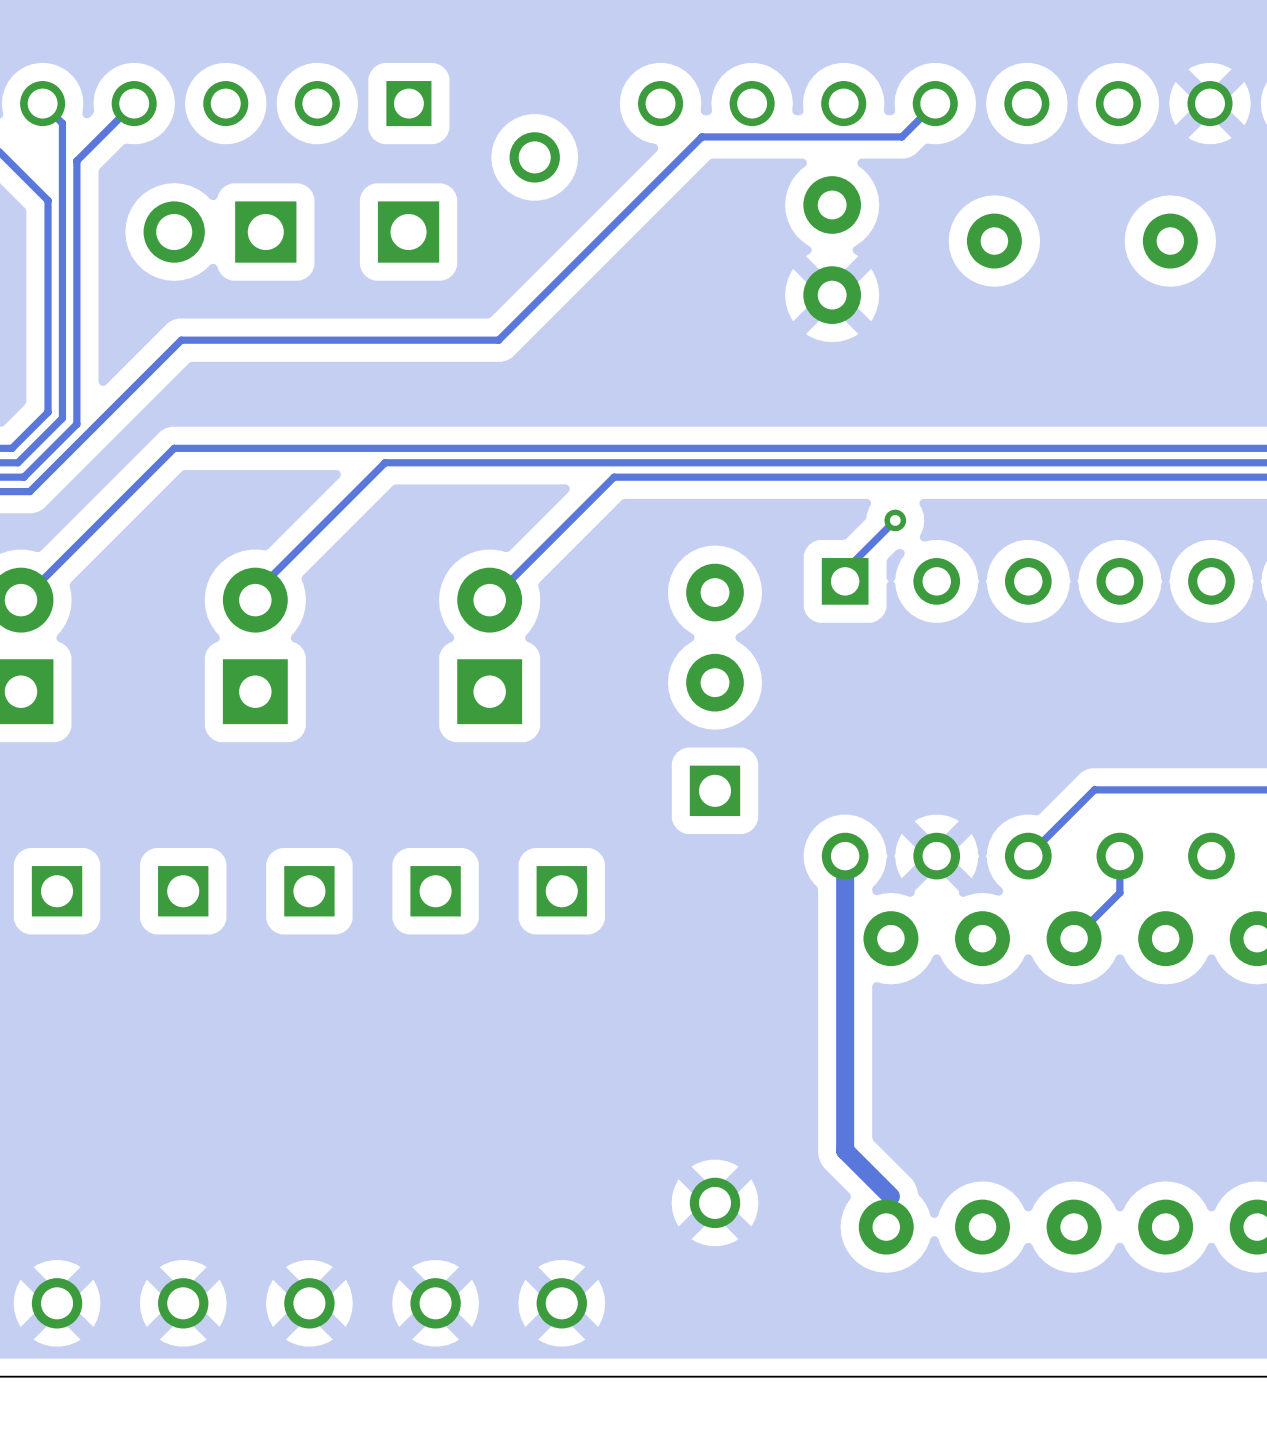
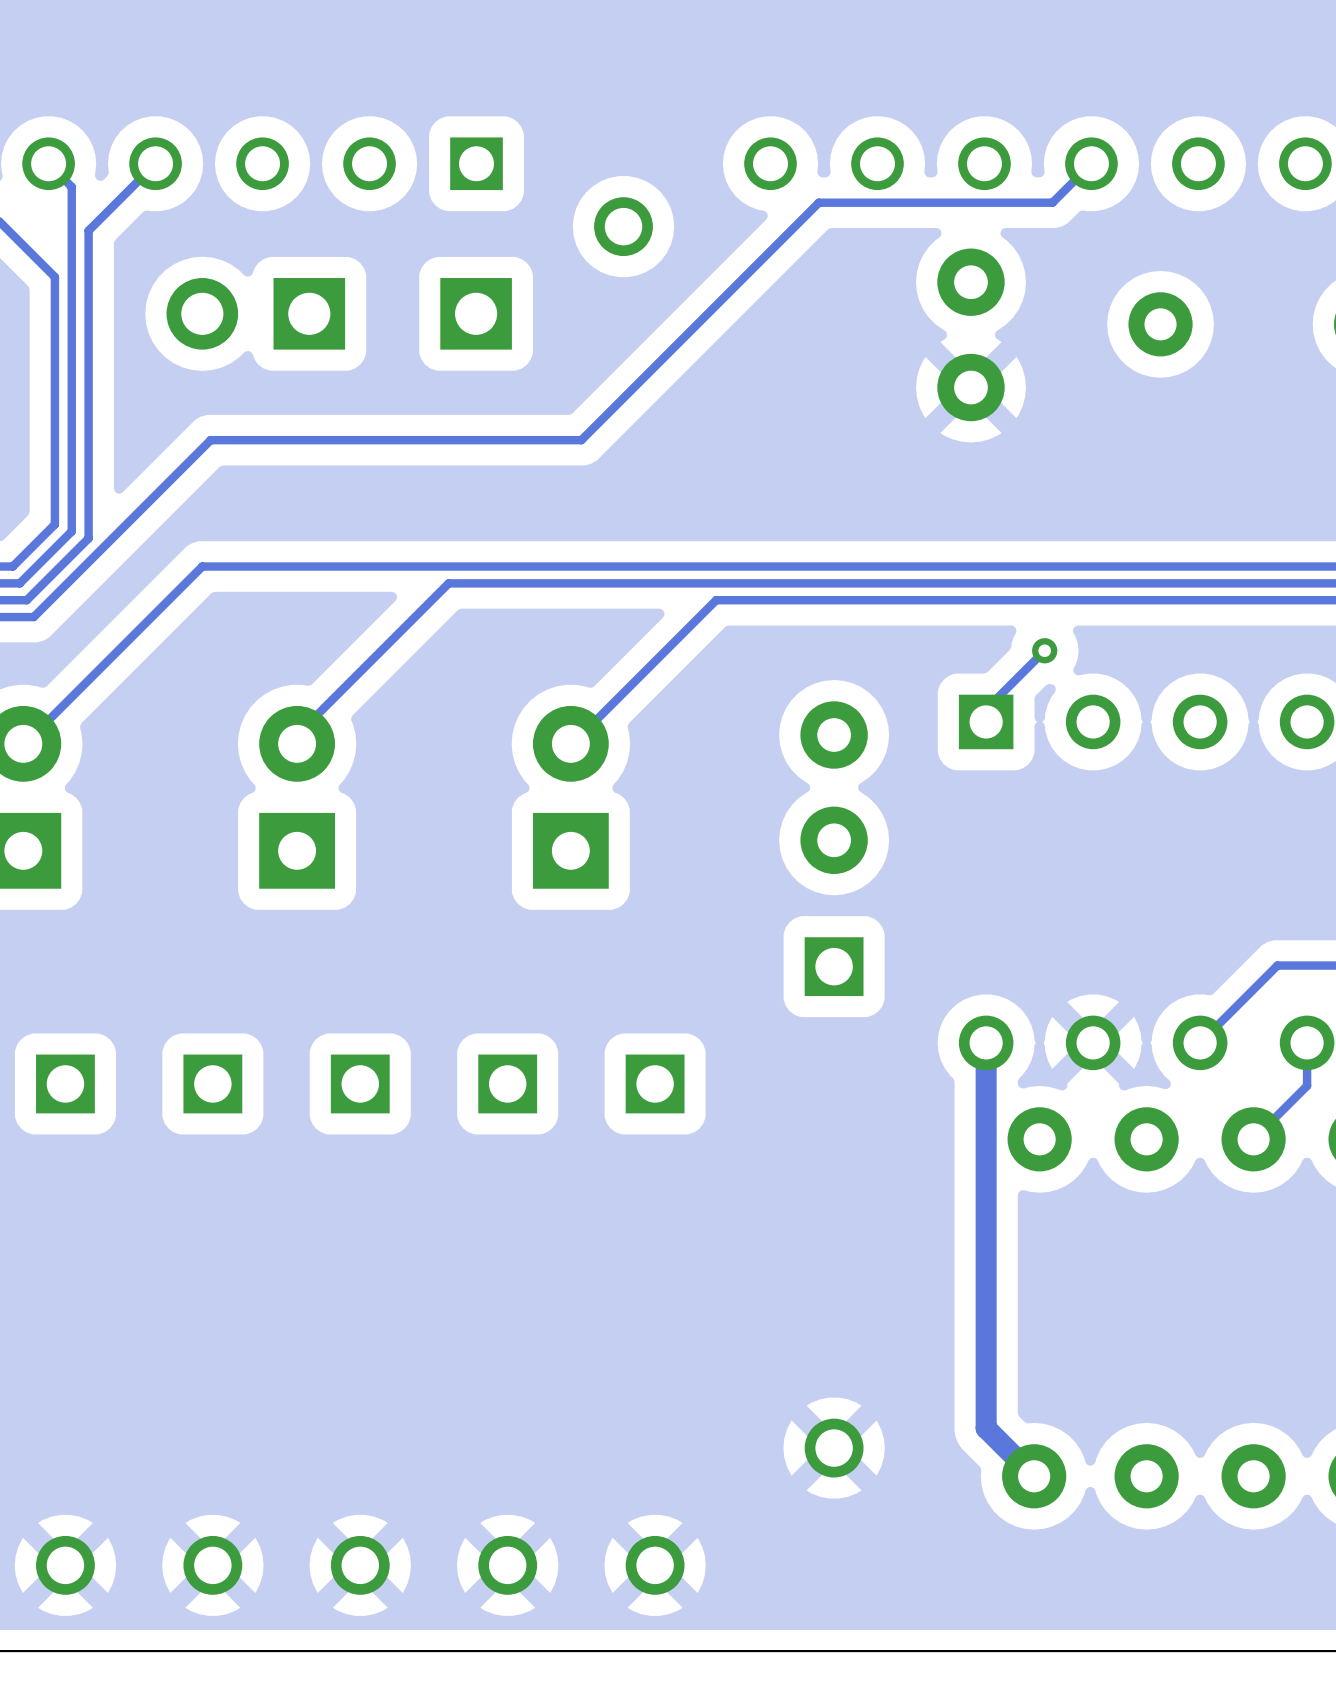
track: (845, 1150) (890, 1196) -> (986, 1387) (986, 1428) (1034, 1476)

